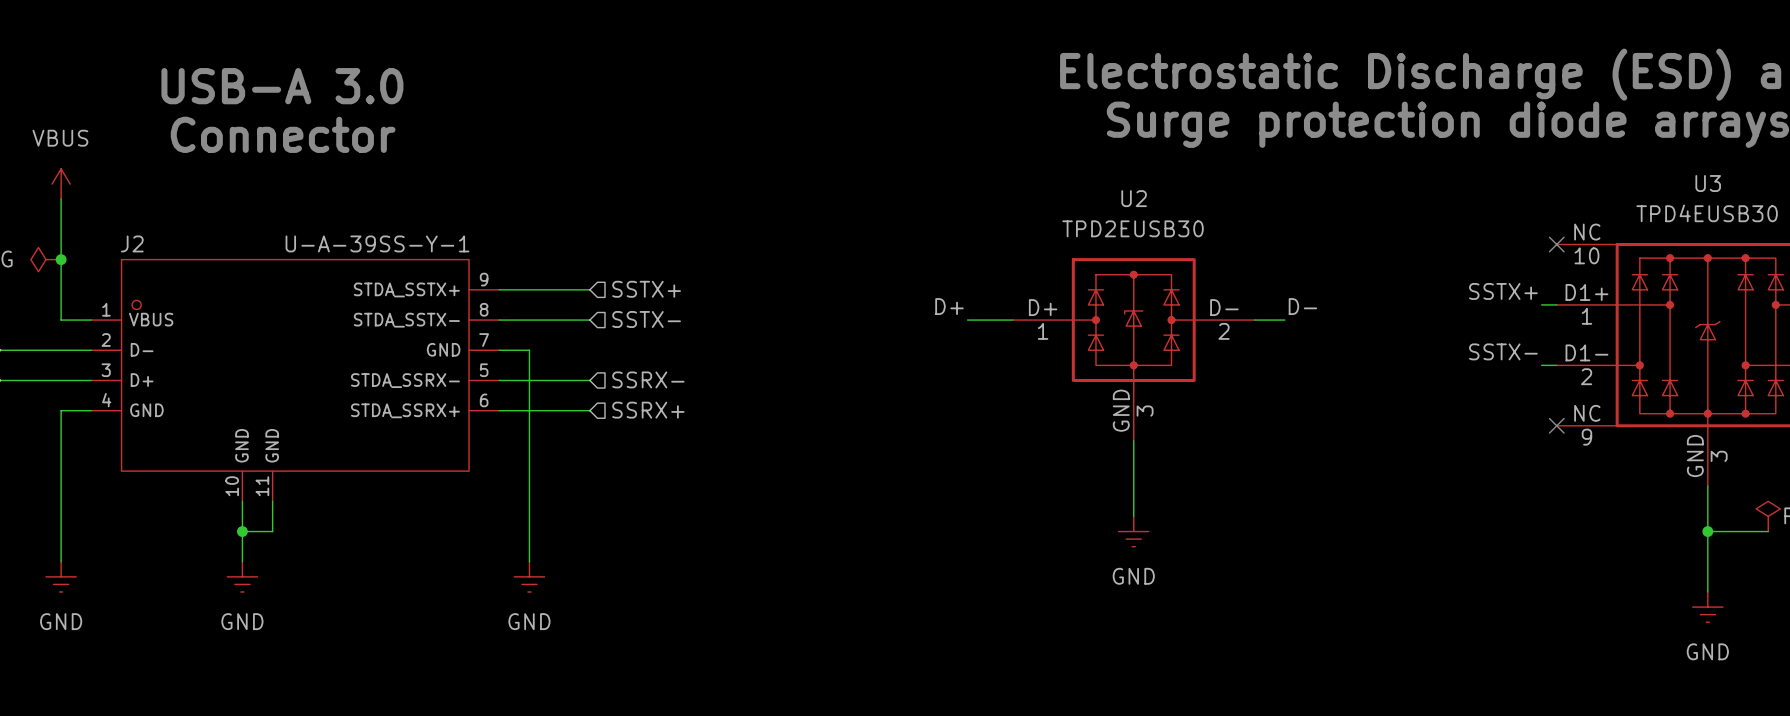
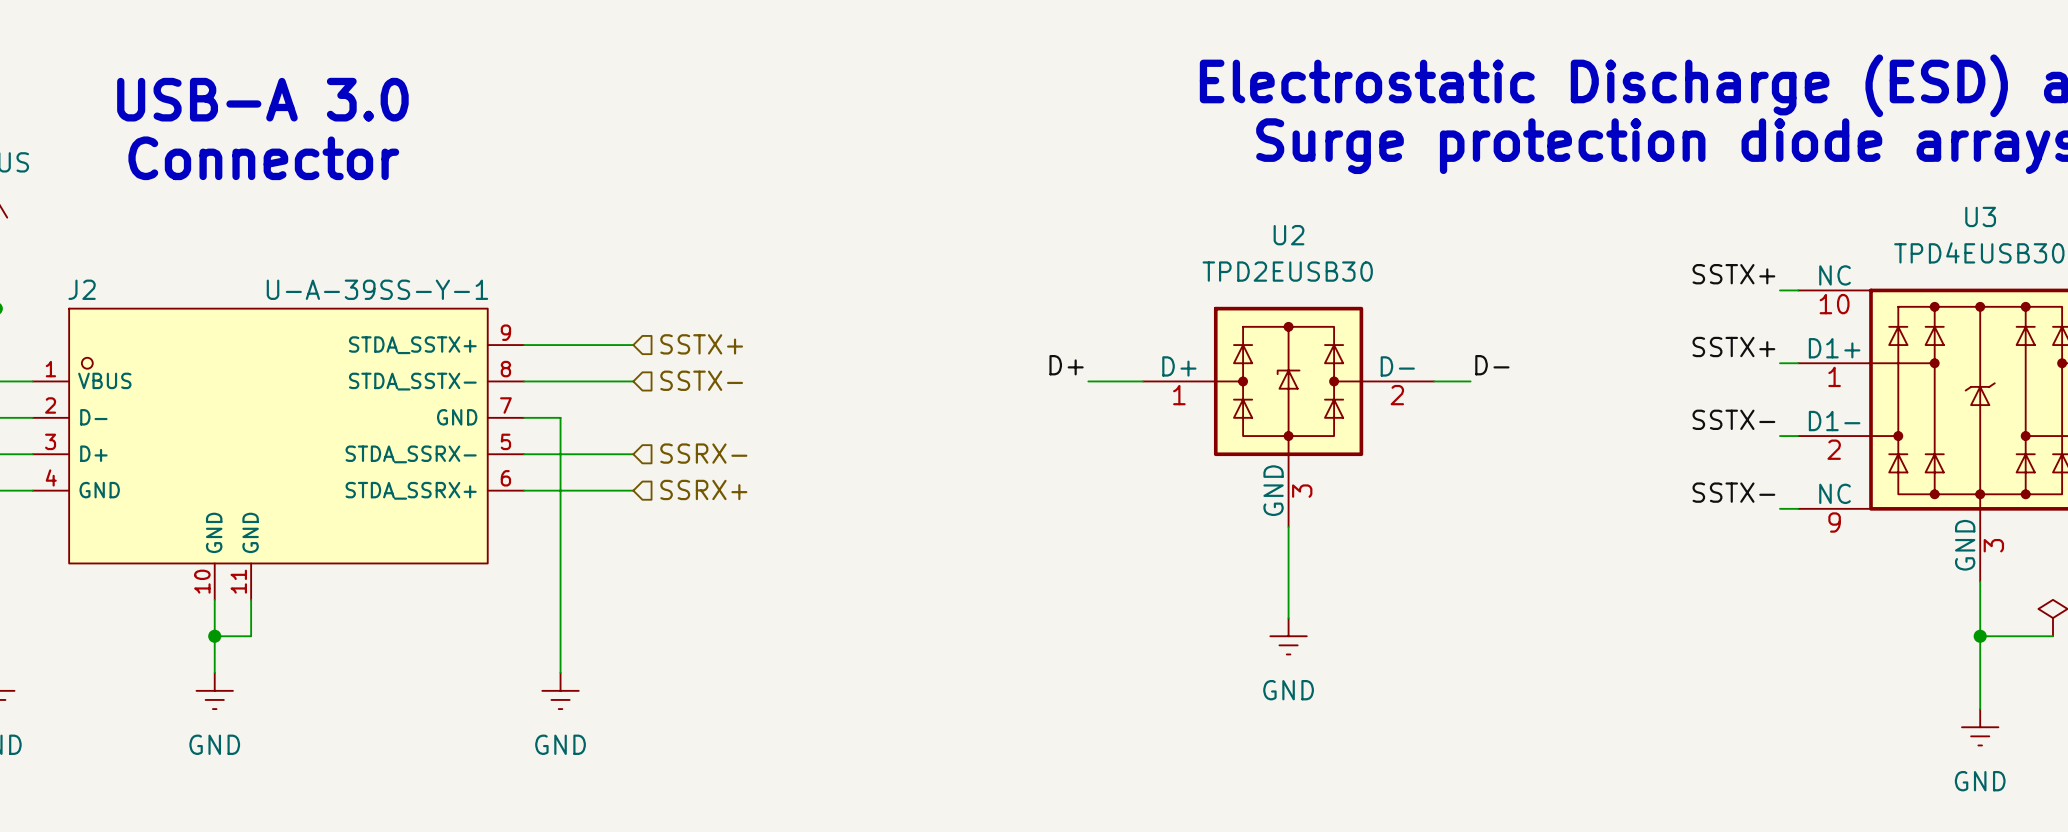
label: none -> SSTX+ (1733, 274)
wire: none -> (1779, 290) (1798, 290)
no-connect mark: (1556, 244) -> none
label: none -> SSTX- (1733, 492)
wire: none -> (1779, 508) (1798, 508)
no-connect mark: (1556, 425) -> none

